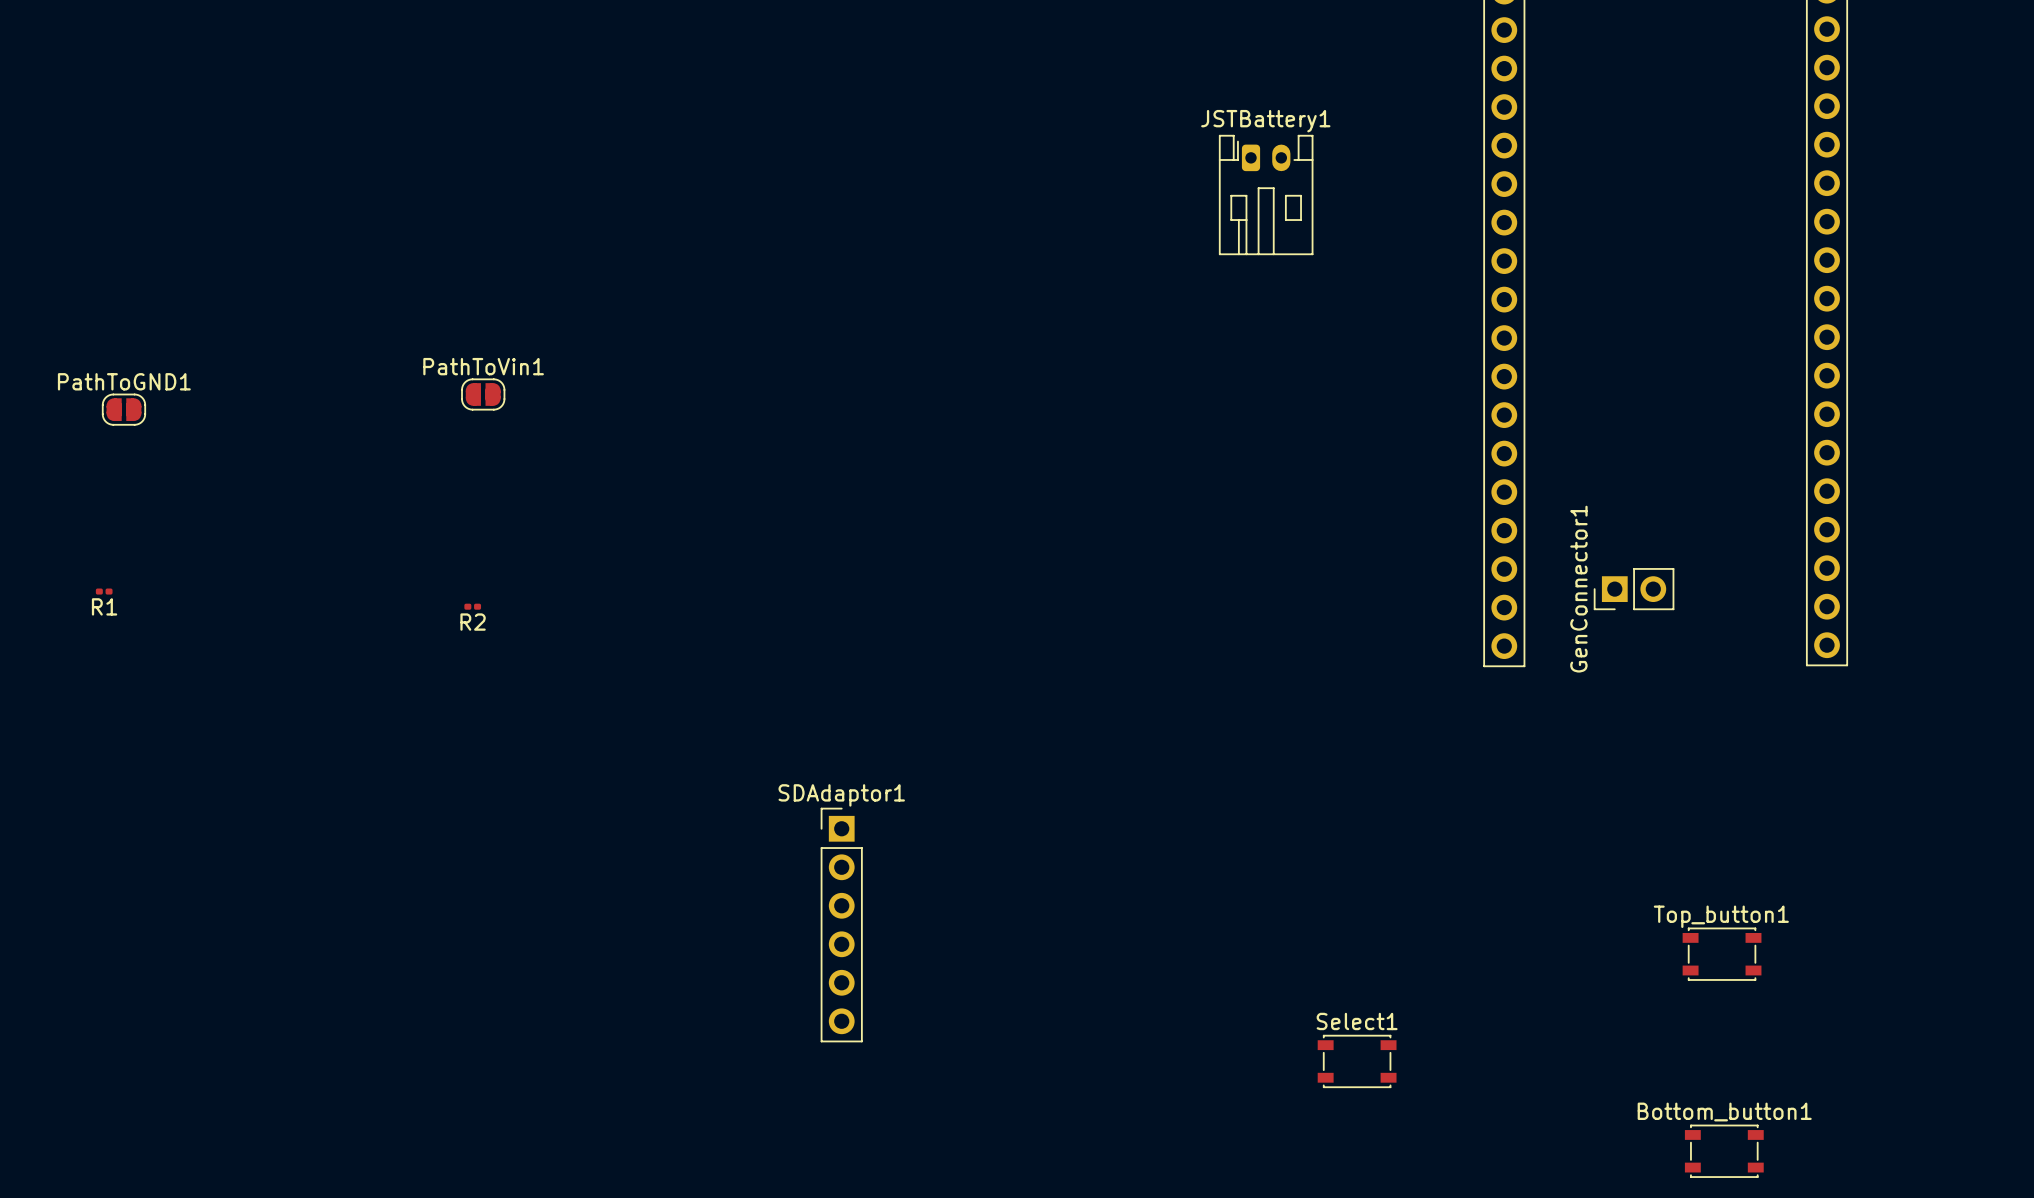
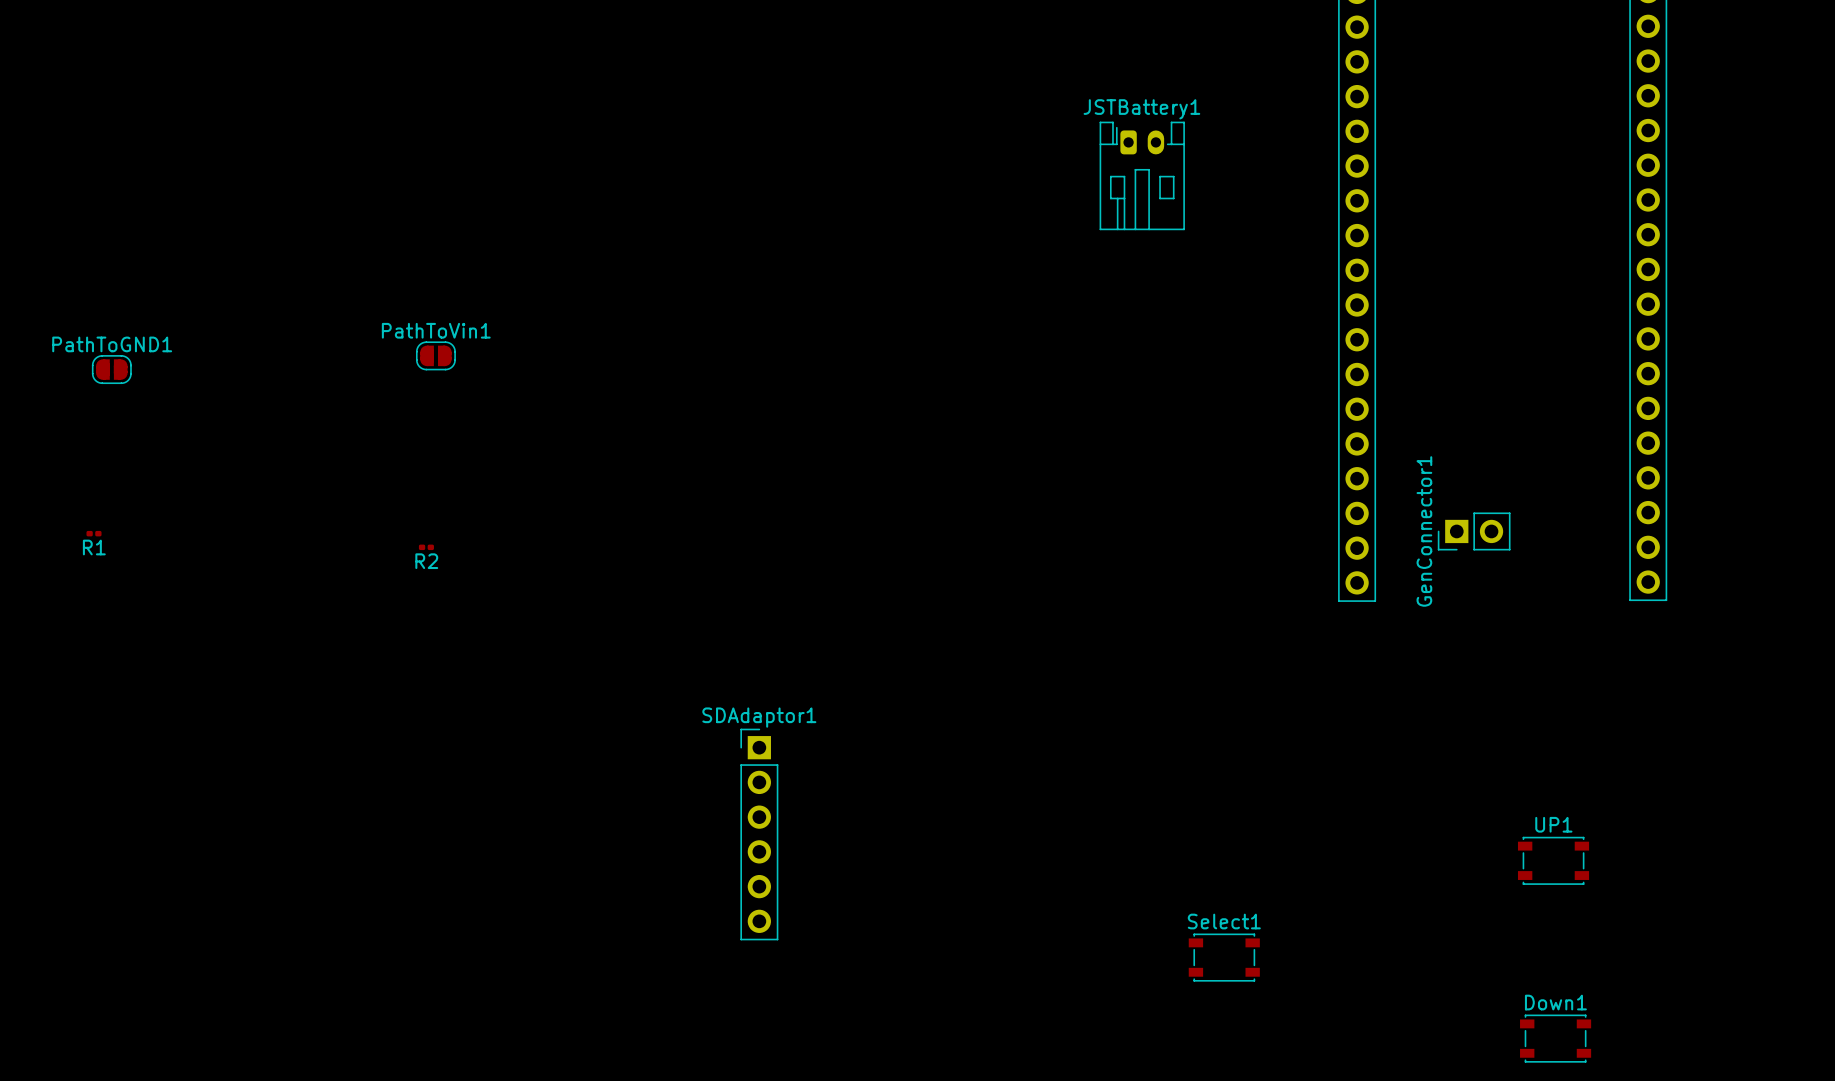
Top_button1 name: Top_button1 (1721, 916) -> UP1 (1553, 824)
Bottom_button1 name: Bottom_button1 (1724, 1112) -> Down1 (1555, 1002)

